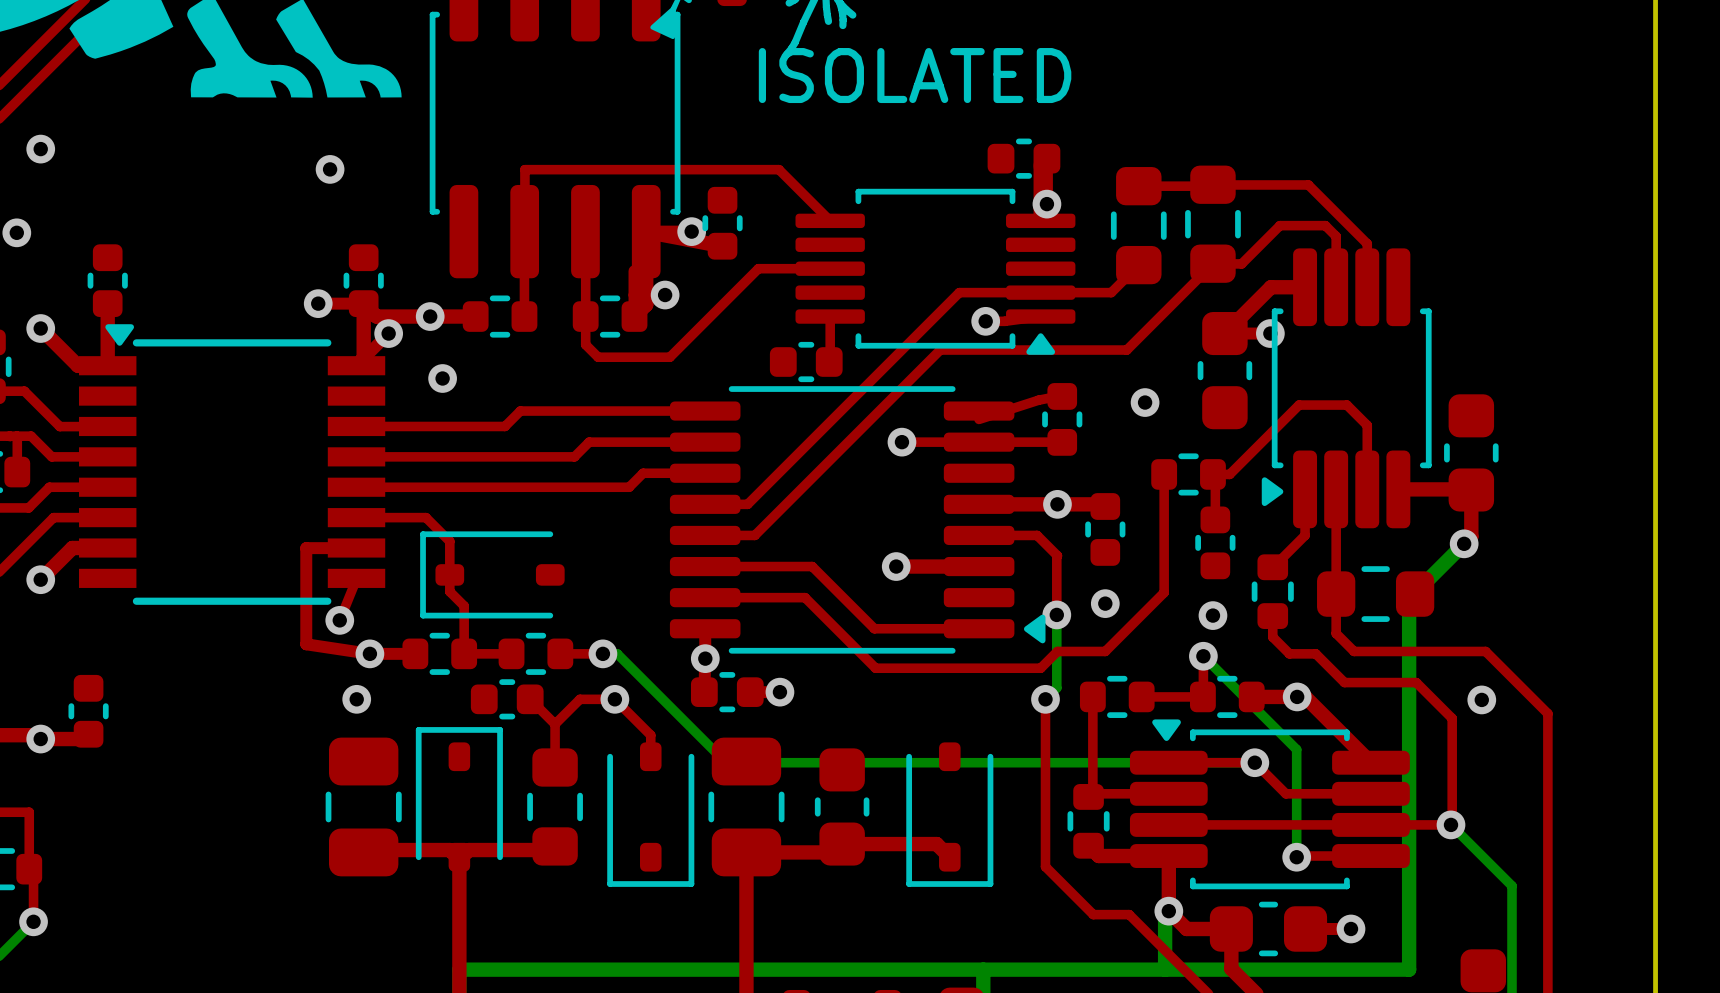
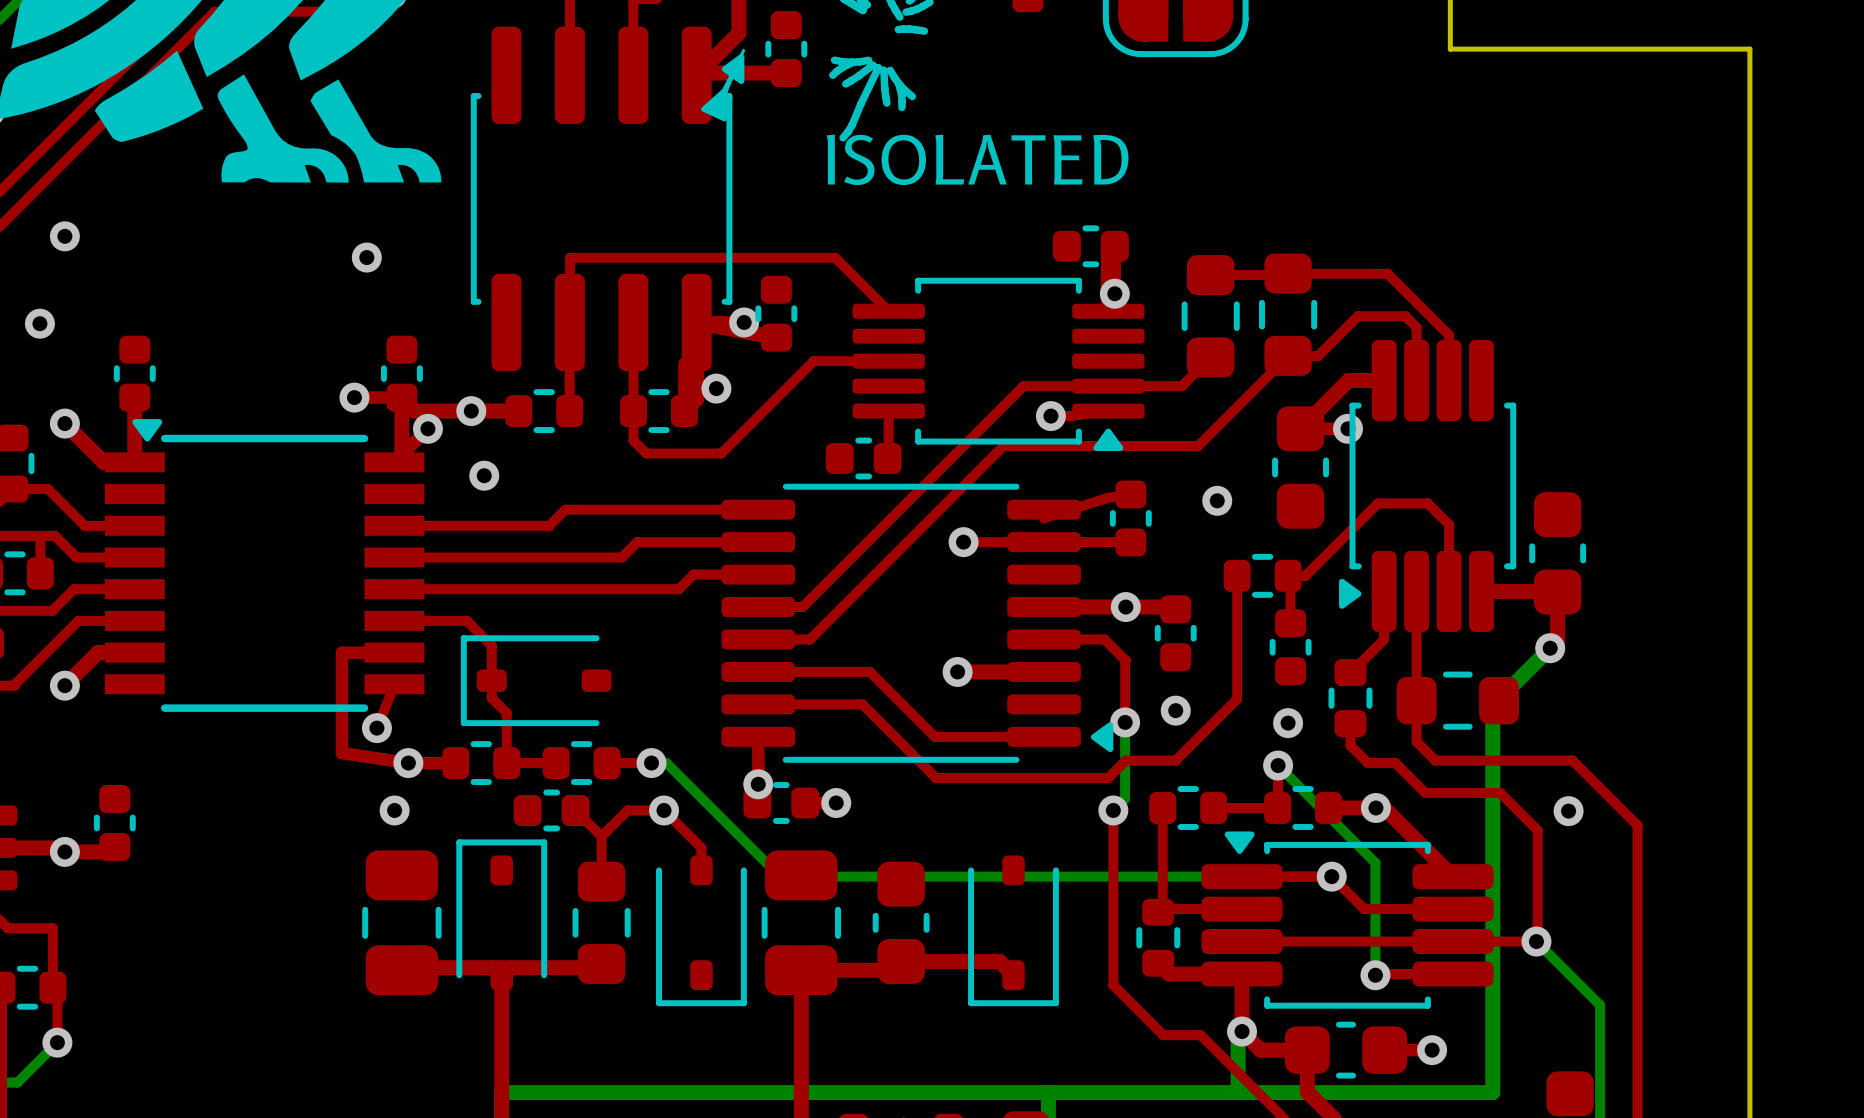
via position: (705, 658) -> (758, 784)

